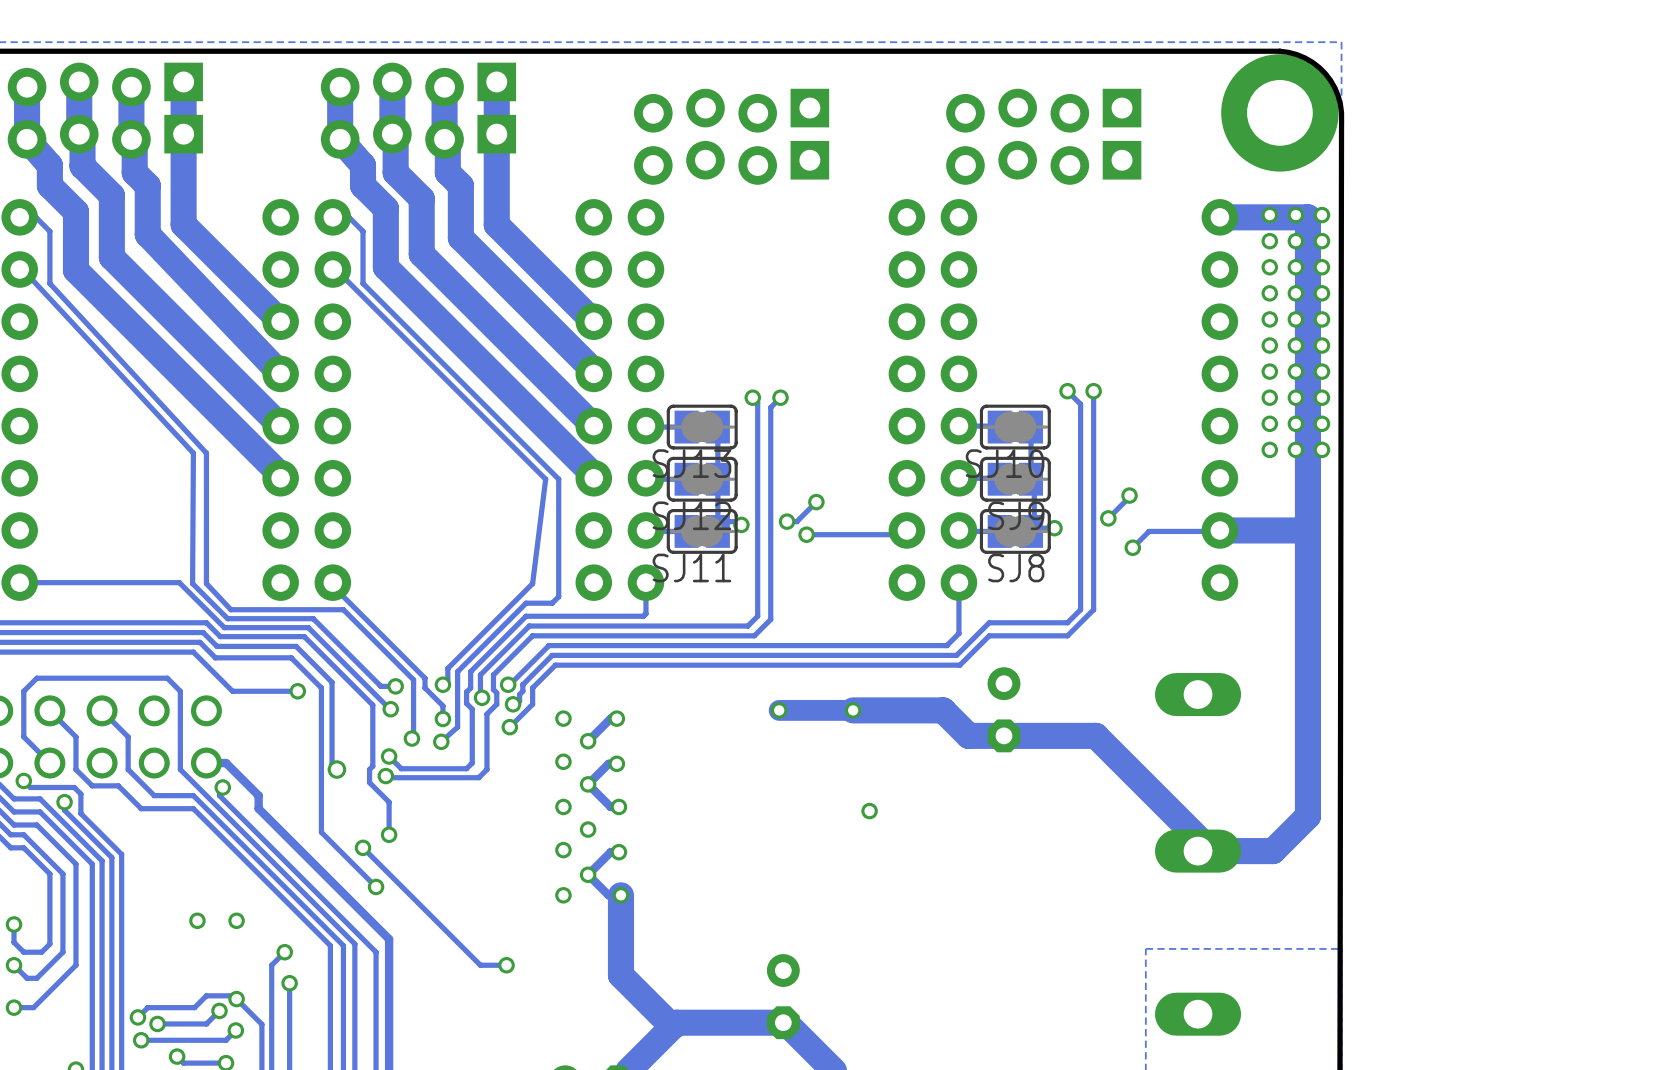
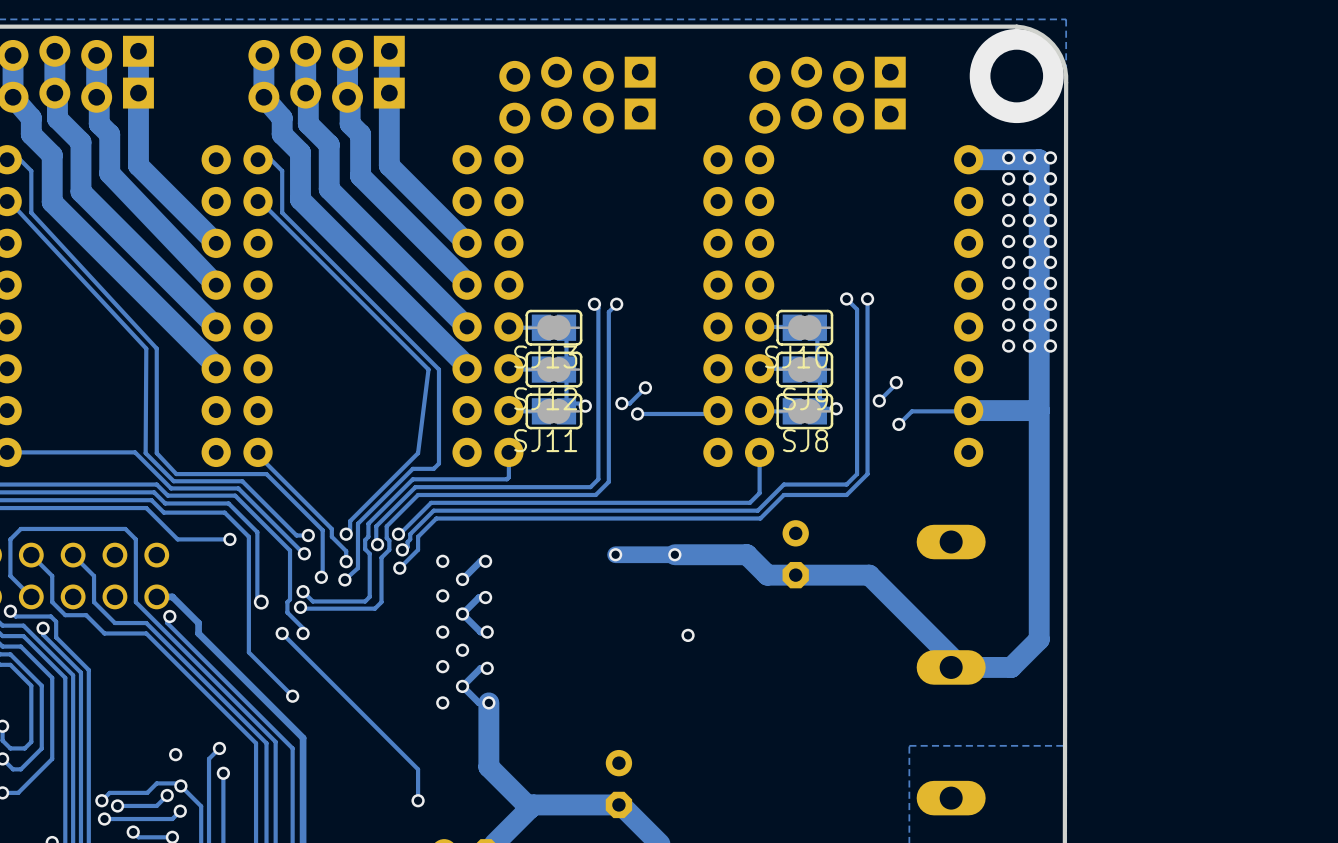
track: none -> (282, 633) (418, 769) (418, 800)
via: none -> (282, 633)
track: (389, 808) (389, 834) -> none
via: none -> (303, 633)
via: (389, 834) -> none
track: (363, 847) (480, 965) (506, 965) -> none
via: (363, 847) -> none
via: (197, 920) -> none
via: (236, 920) -> none
via: none -> (175, 754)
via position: (506, 965) -> (418, 800)

